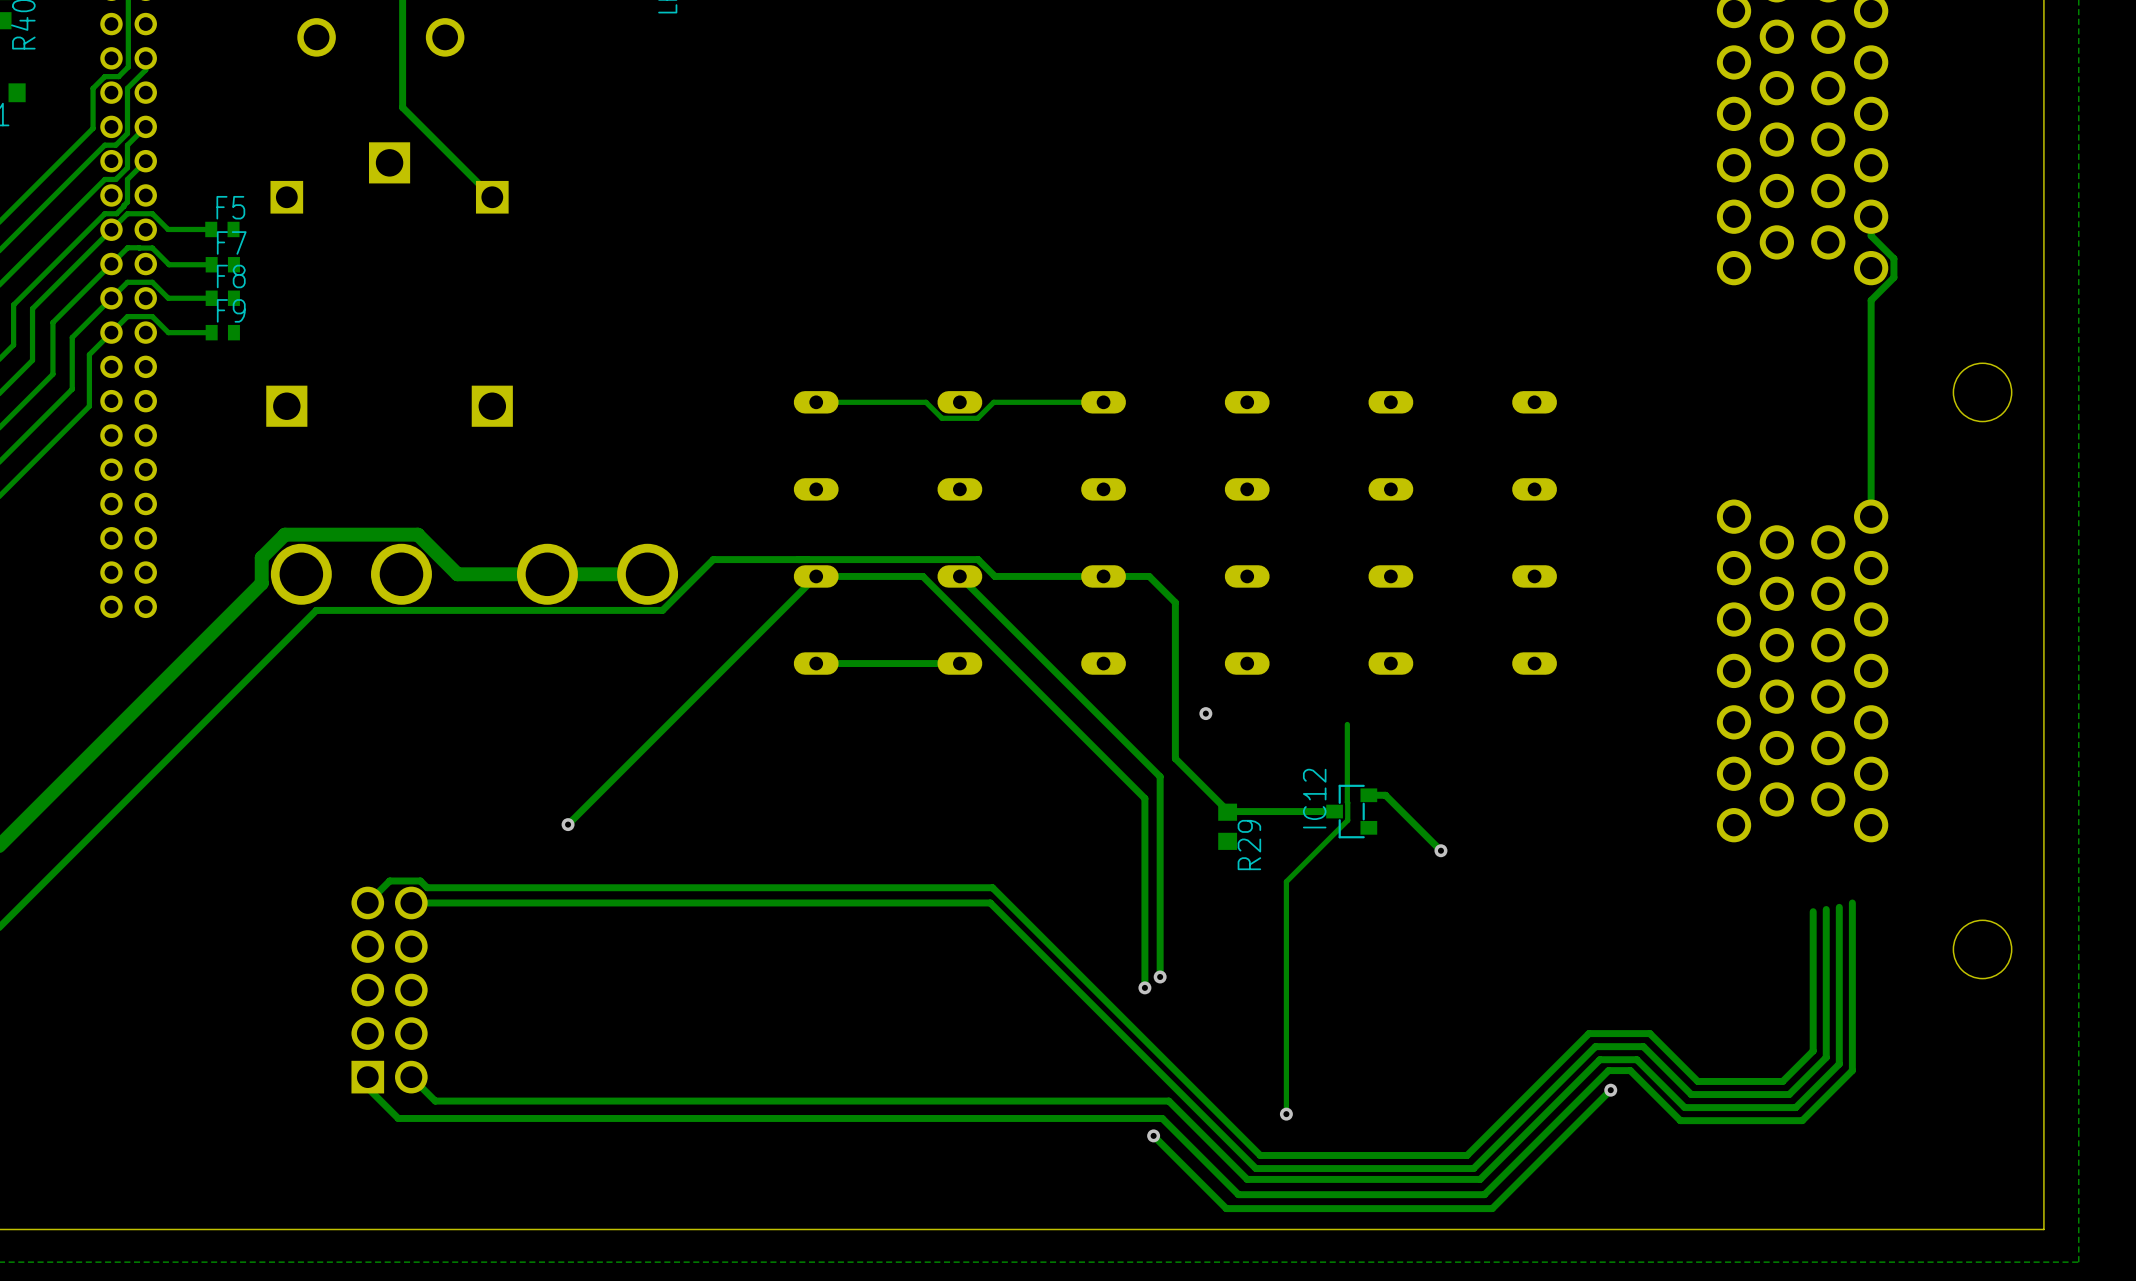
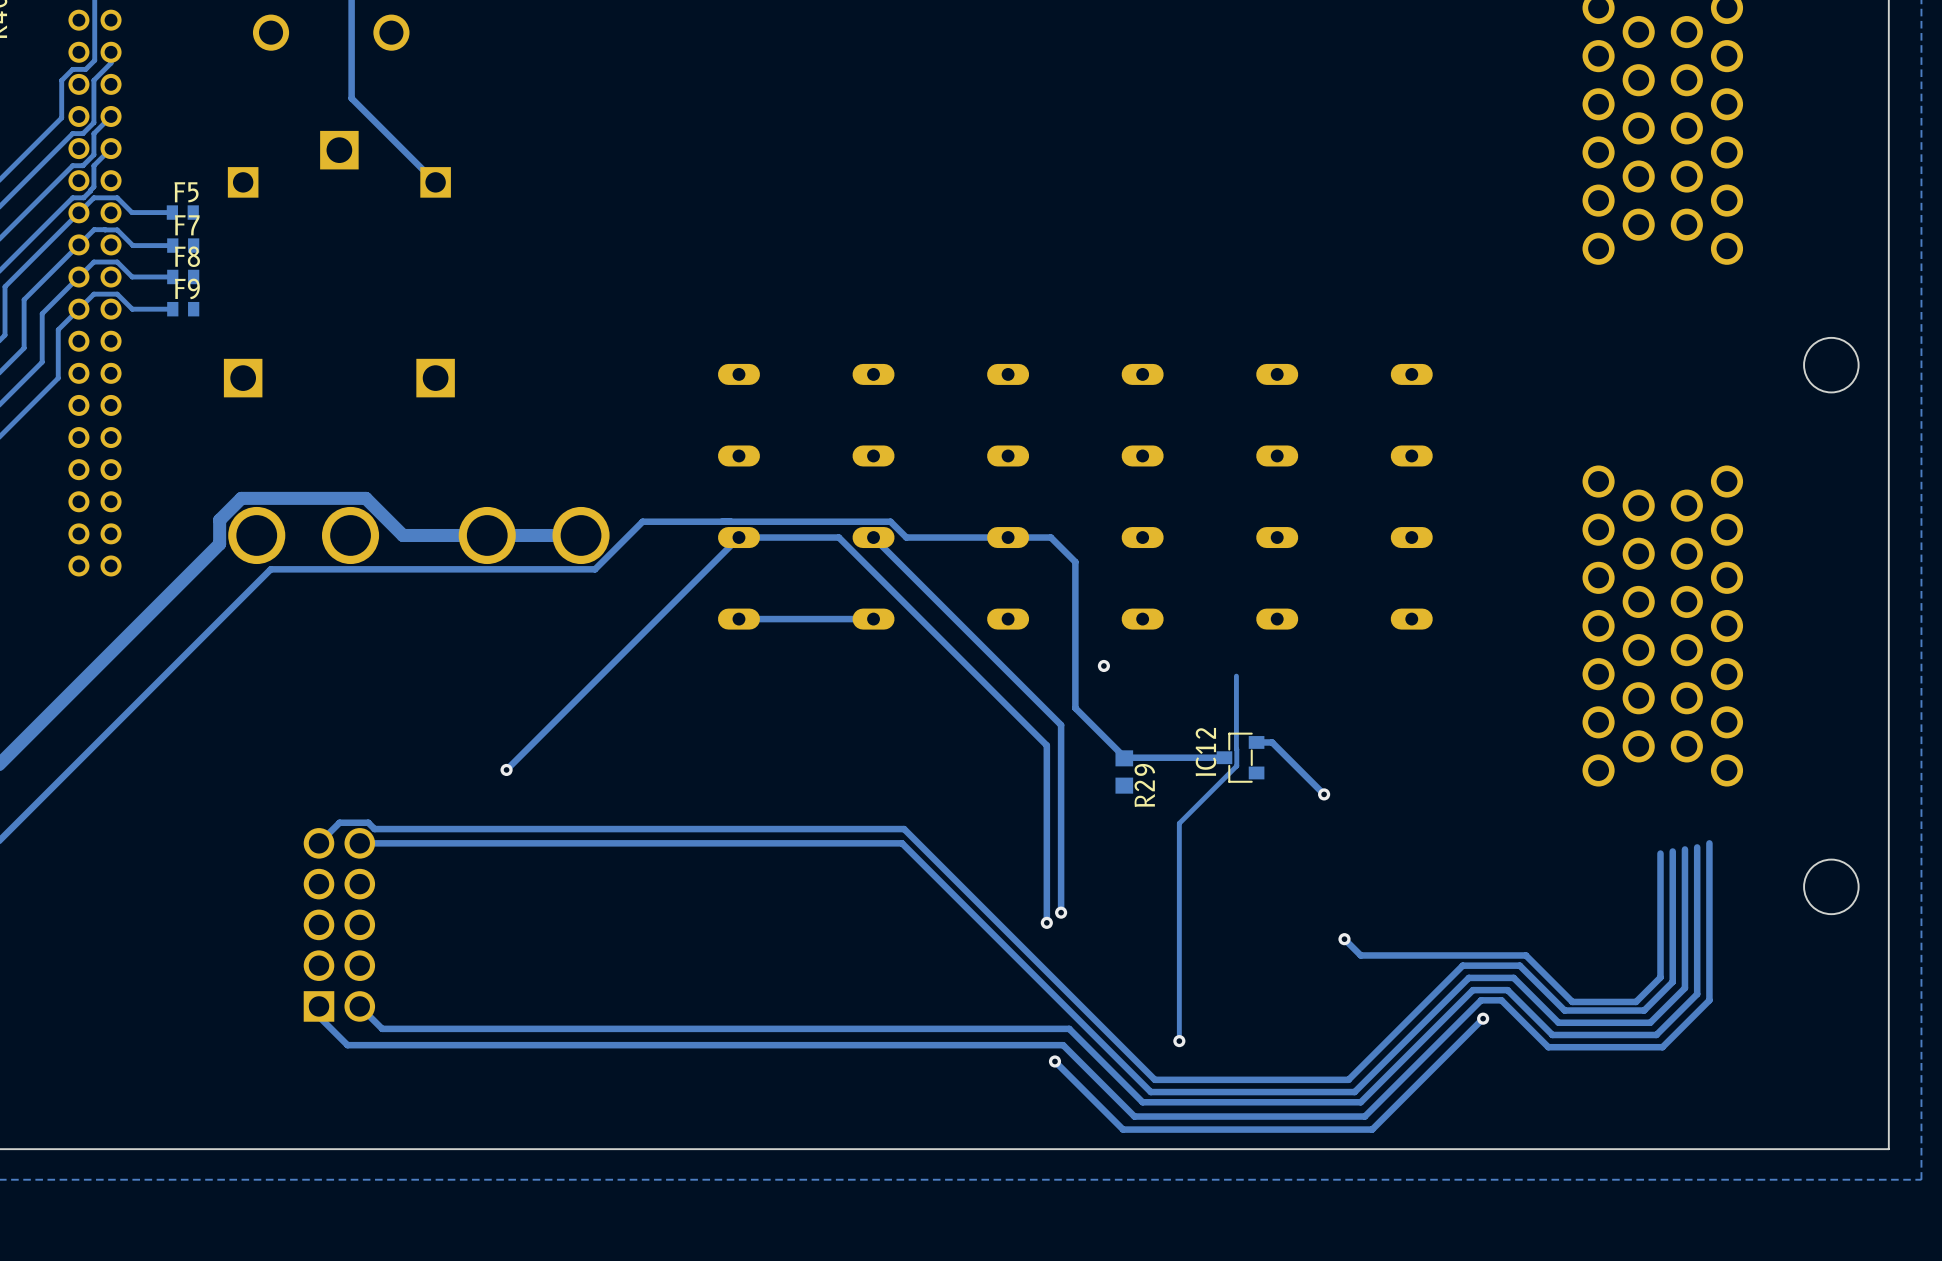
track: (1871, 216) (1871, 235) (1893, 258) (1893, 277) (1871, 300) (1871, 516) -> none
track: (1103, 402) (993, 402) (977, 418) (942, 418) (926, 402) (816, 402) -> none
track: none -> (1660, 853) (1660, 977) (1636, 1001) (1572, 1001) (1525, 955) (1360, 955) (1344, 939)
via: none -> (1344, 939)

